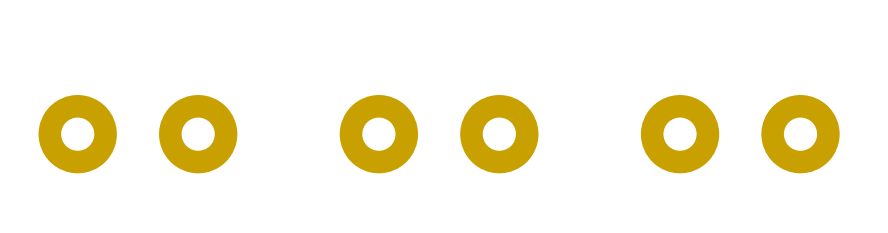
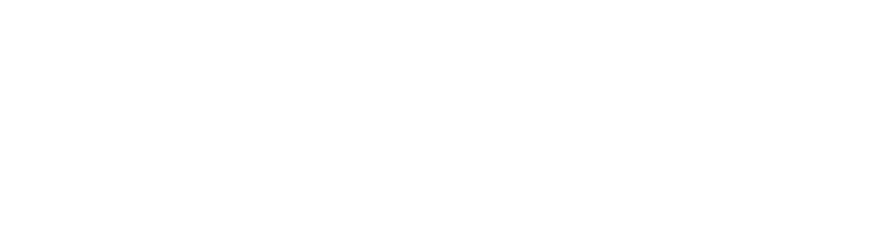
part: (137, 134) -> none
part: (439, 134) -> none
part: (740, 134) -> none

